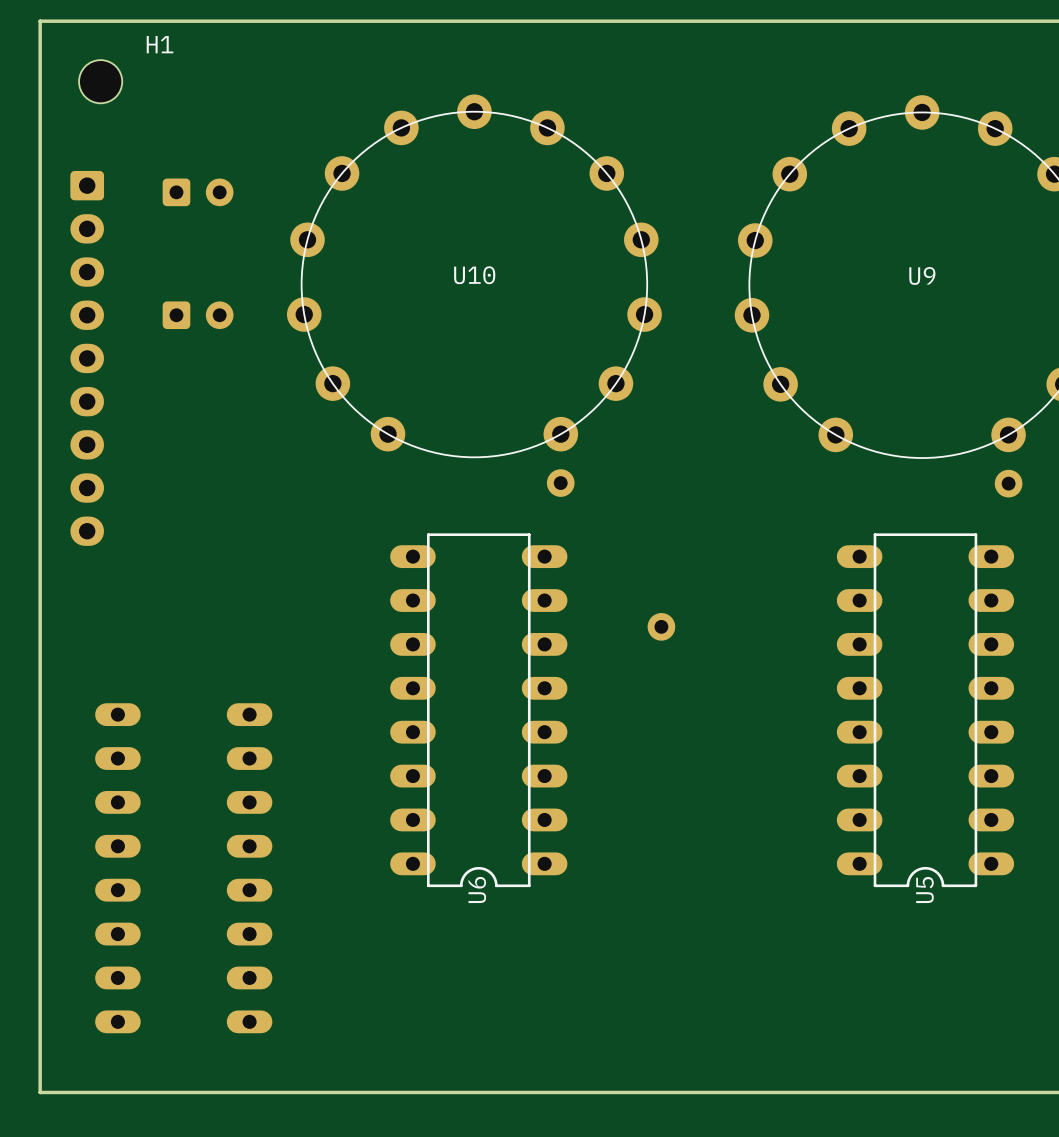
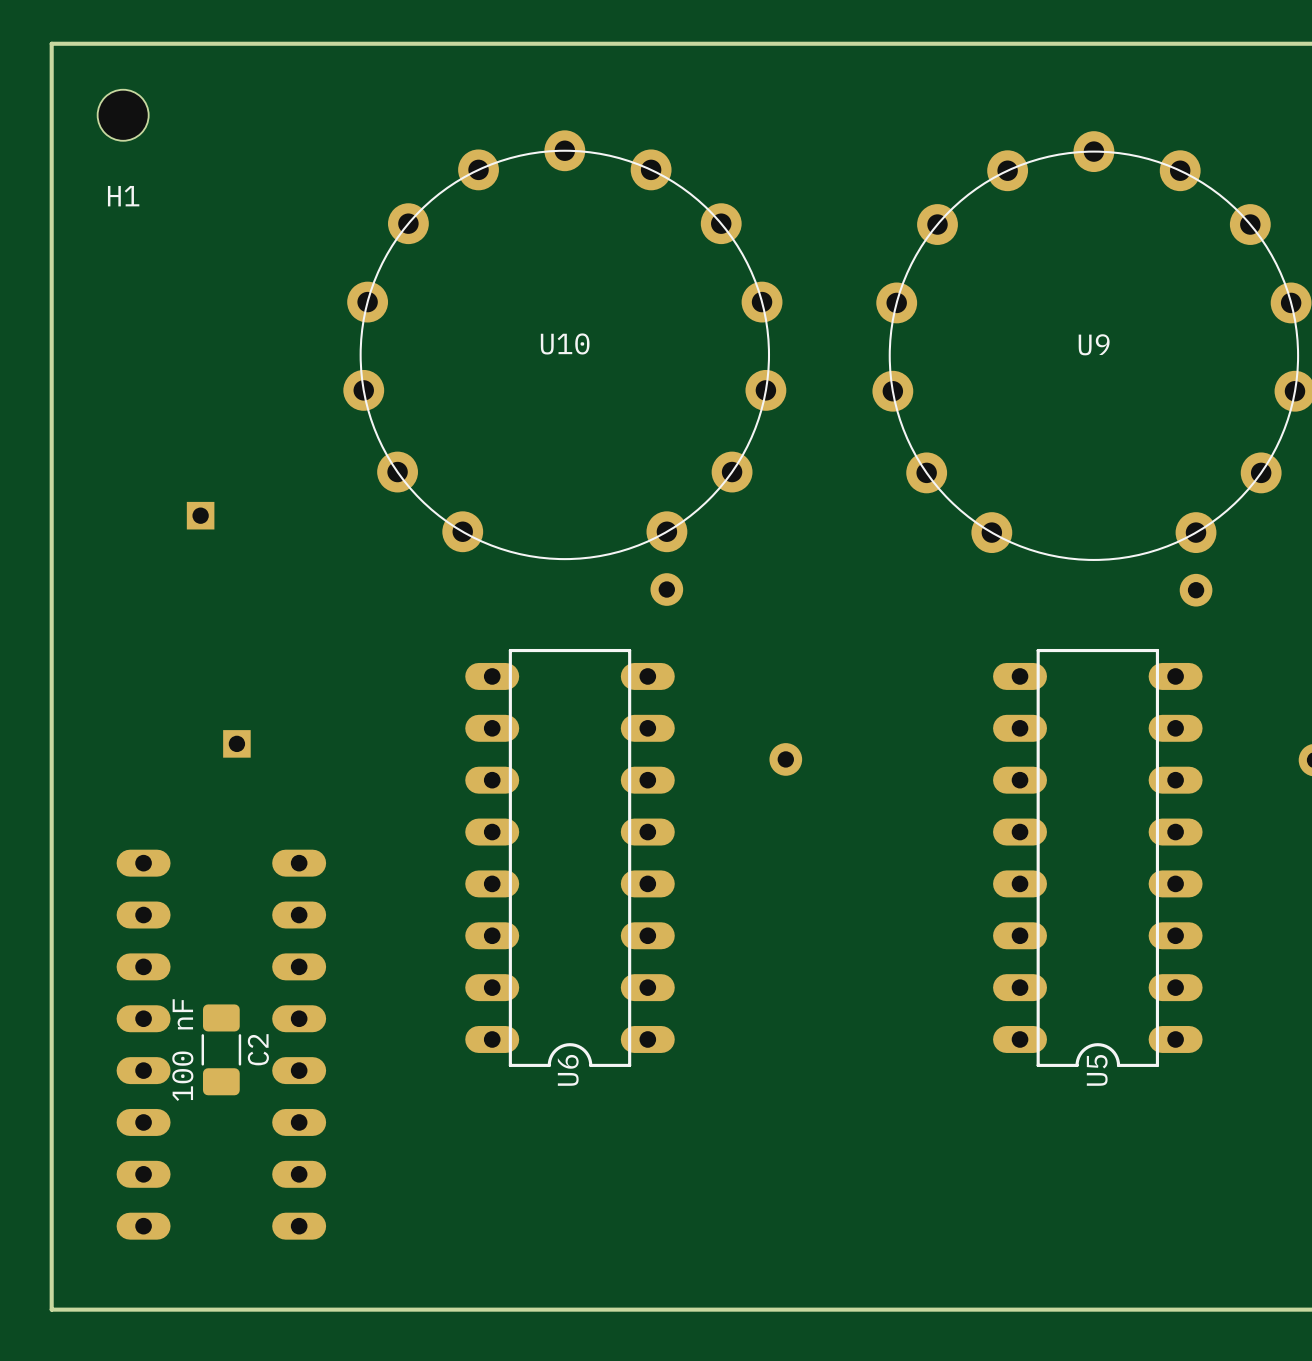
H1 name position: H1 (160, 44) -> H1 (123, 196)
part: (198, 192) -> none
part: (198, 315) -> none
part: (87, 358) -> none
part: none -> (200, 515)
part: none -> (236, 743)
C2: none -> 100 nF (221, 1049)

